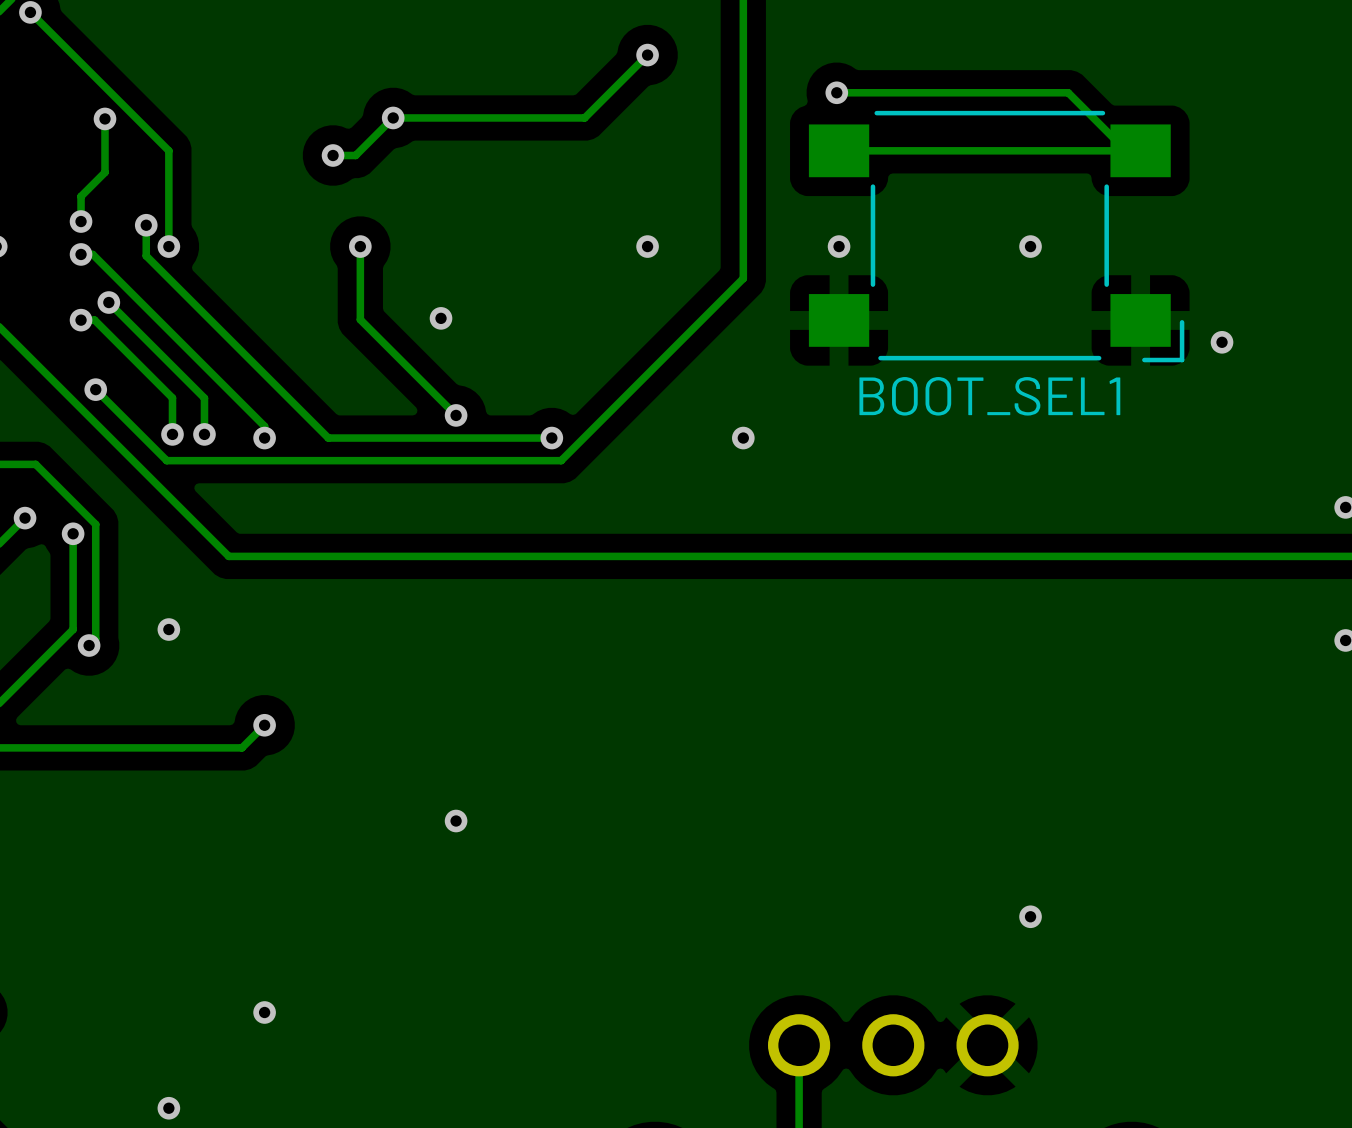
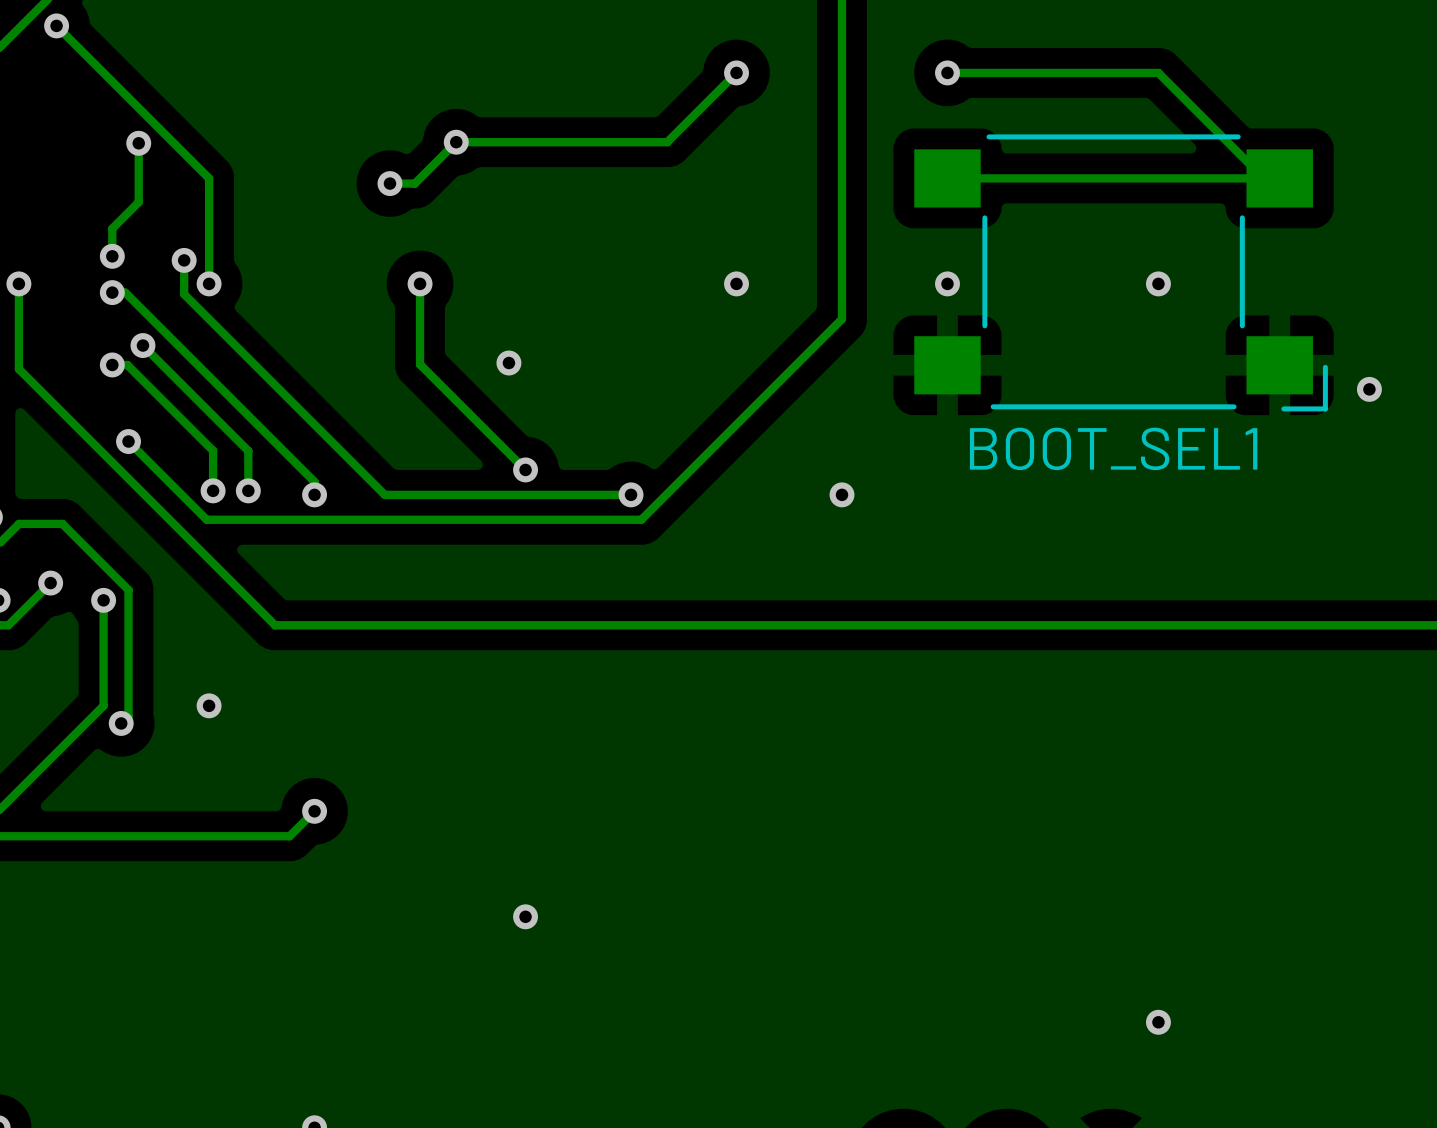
via position: (836, 92) -> (947, 72)
track: (1068, 92) (836, 92) -> (1199, 114) (1158, 72) (947, 72)

